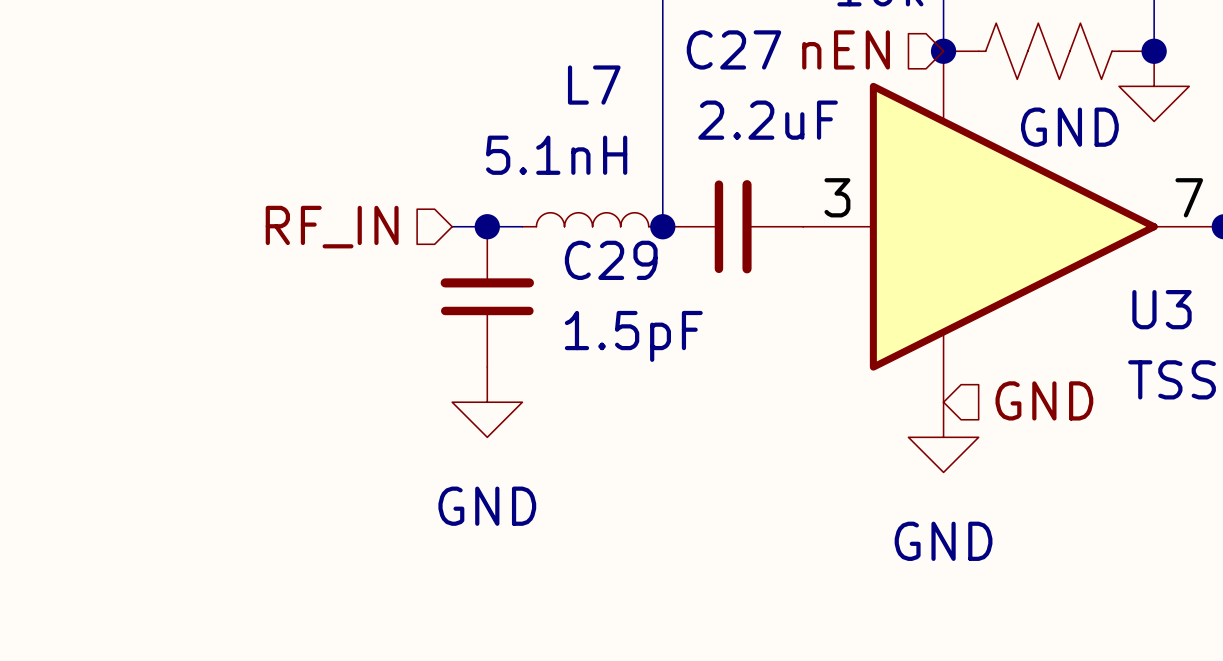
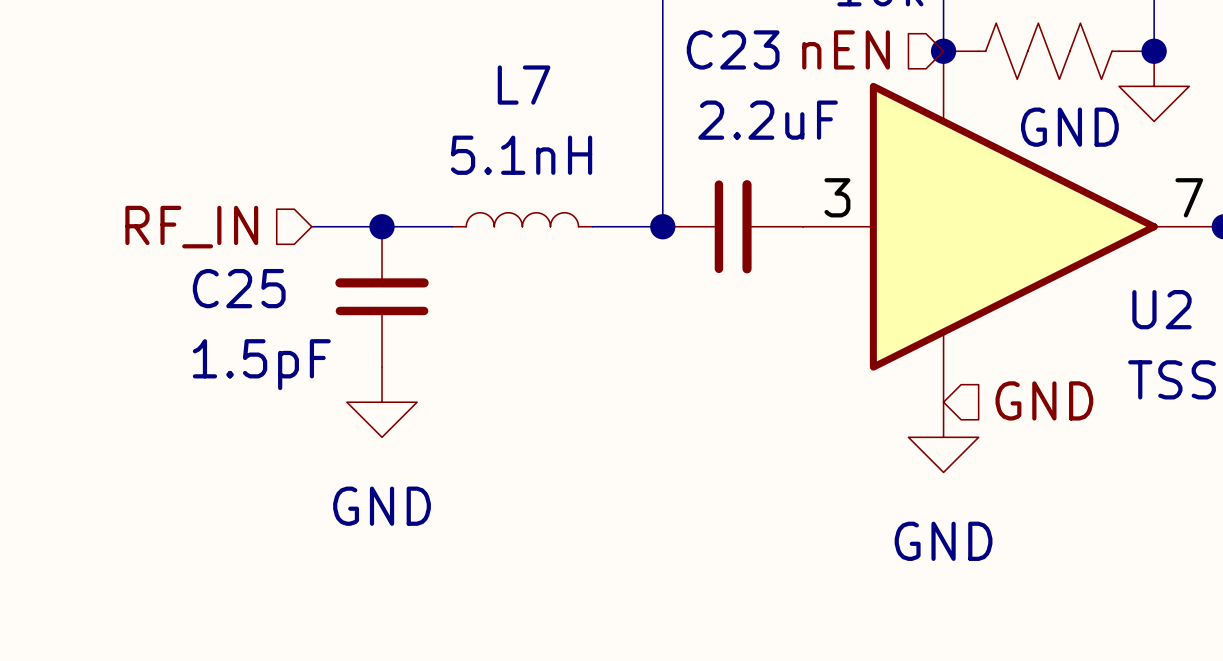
C27 name: C27 (733, 49) -> C23 (733, 49)
L7 value position: 5.1nH (556, 155) -> 5.1nH (521, 155)
L7 position: (592, 219) -> (522, 219)
wire: (452, 226) (522, 226) -> (452, 226) (311, 226)
junction position: (487, 226) -> (382, 226)
wire: none -> (592, 226) (662, 226)
hierarchical label position: RF_IN (332, 227) -> RF_IN (191, 227)
C25: none -> 1.5pF (382, 296)
C29: 1.5pF (487, 296) -> none
U3 name: U3 (1161, 309) -> U2 (1161, 309)
power symbol position: GND (487, 402) -> GND (382, 402)

